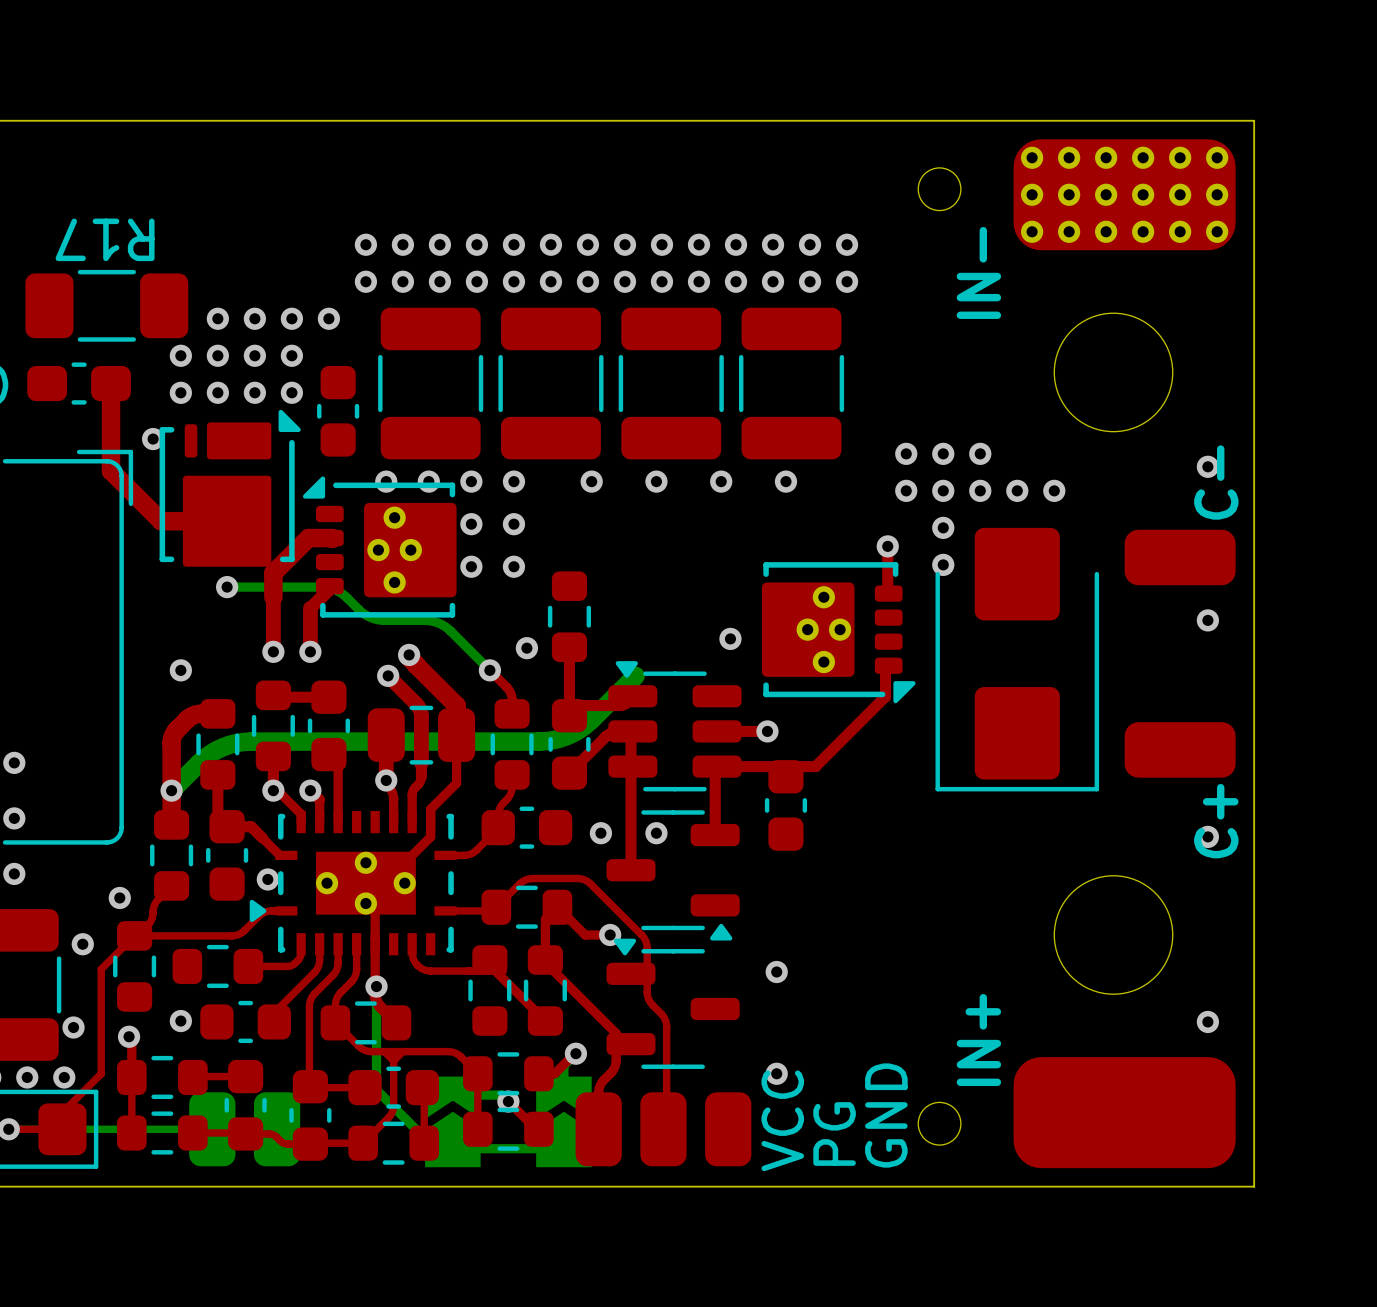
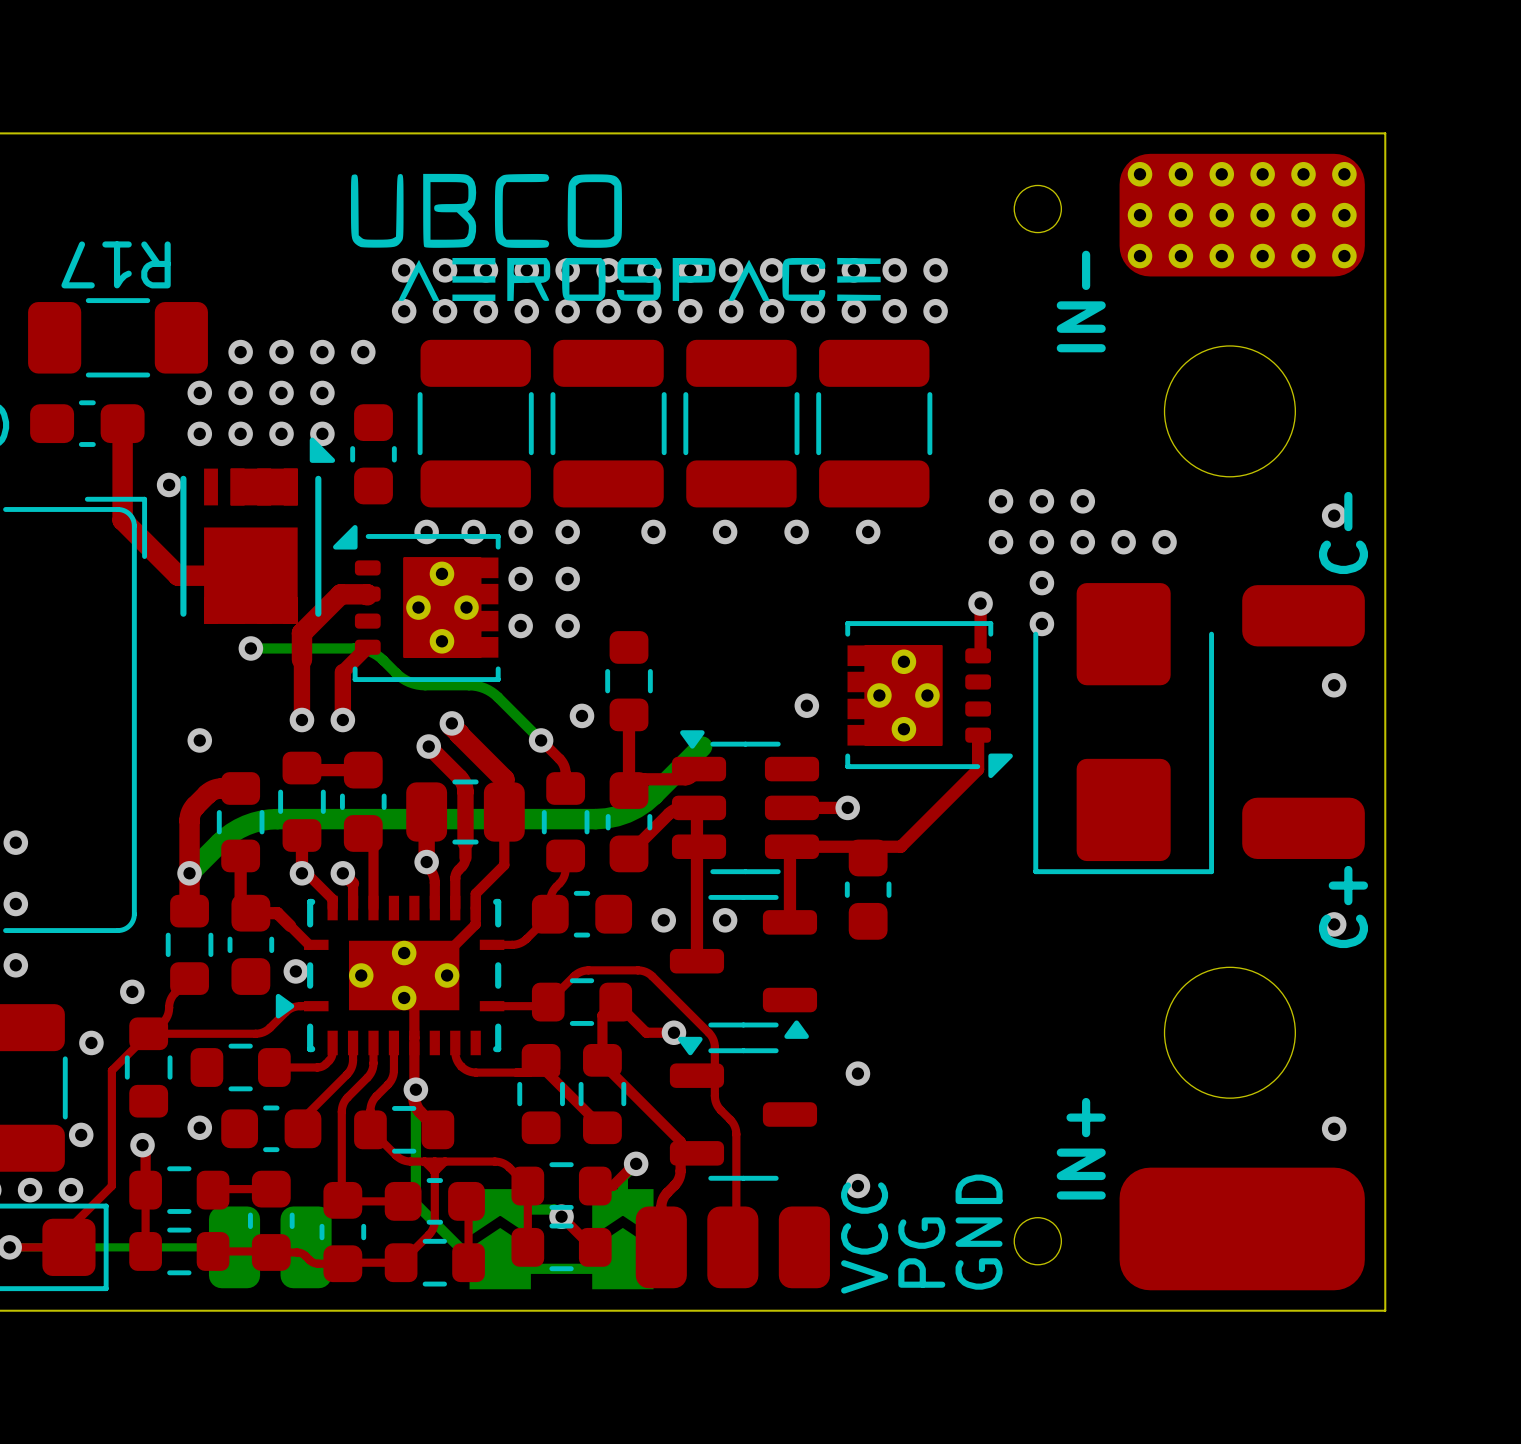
drawing: none -> [350, 173, 881, 301]
part footprint: [159, 409, 301, 567] -> [180, 437, 336, 624]
part footprint: [302, 476, 457, 618] -> [333, 525, 501, 682]
part footprint: [761, 562, 916, 704] -> [845, 621, 1013, 779]

